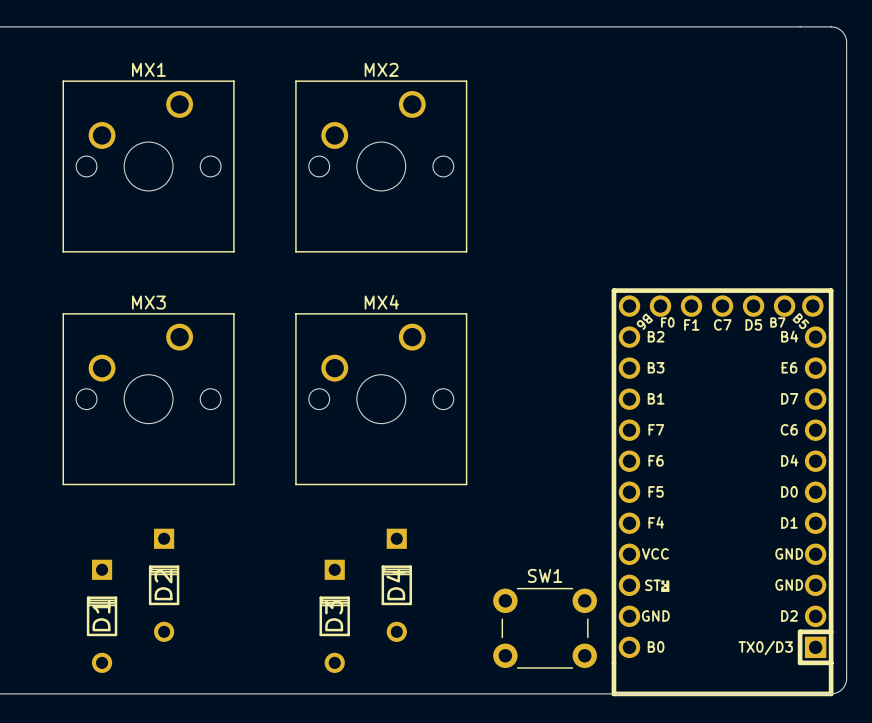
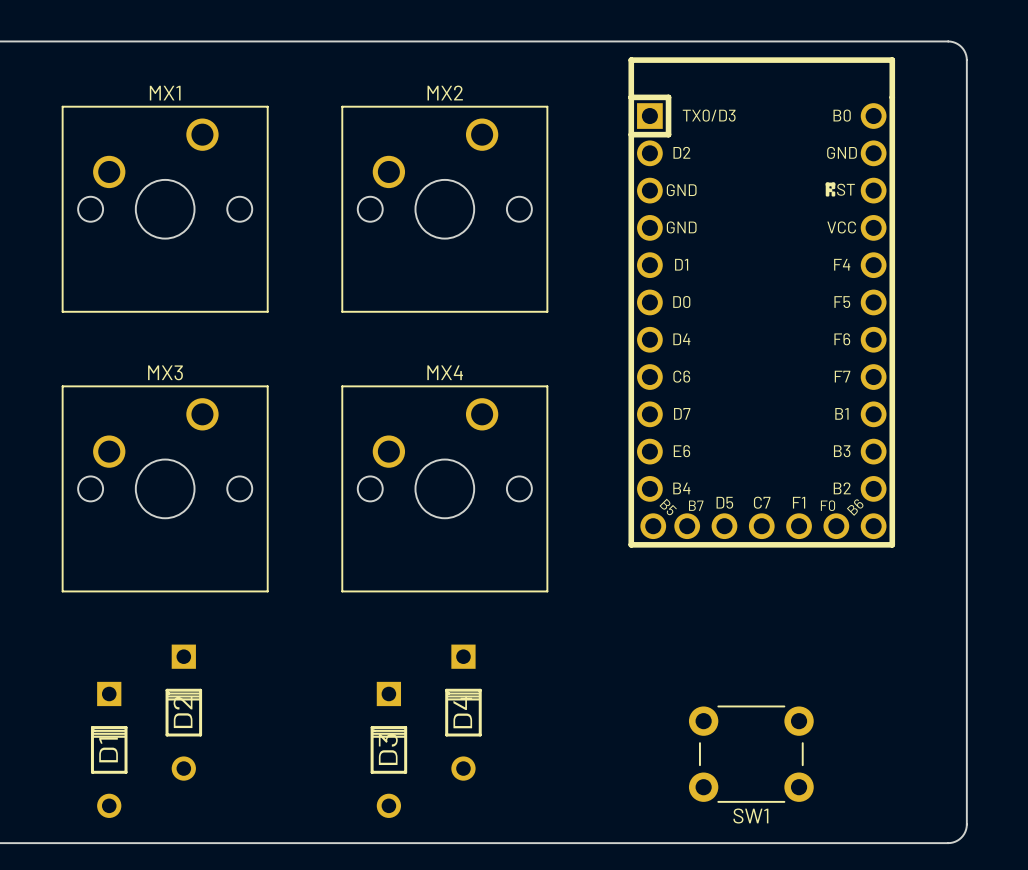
board edge: (800, 26) (835, 27) (843, 32) (846, 42) (846, 680) (842, 689) (835, 693) (800, 693) -> (948, 41) (961, 46) (966, 60) (966, 824) (961, 837) (948, 843)
part rotation: 0° (722, 492) -> 180° (761, 302)
part position: (722, 492) -> (761, 302)
SW1 name position: SW1 (545, 575) -> SW1 (750, 816)
SW1 position: (545, 628) -> (751, 754)

